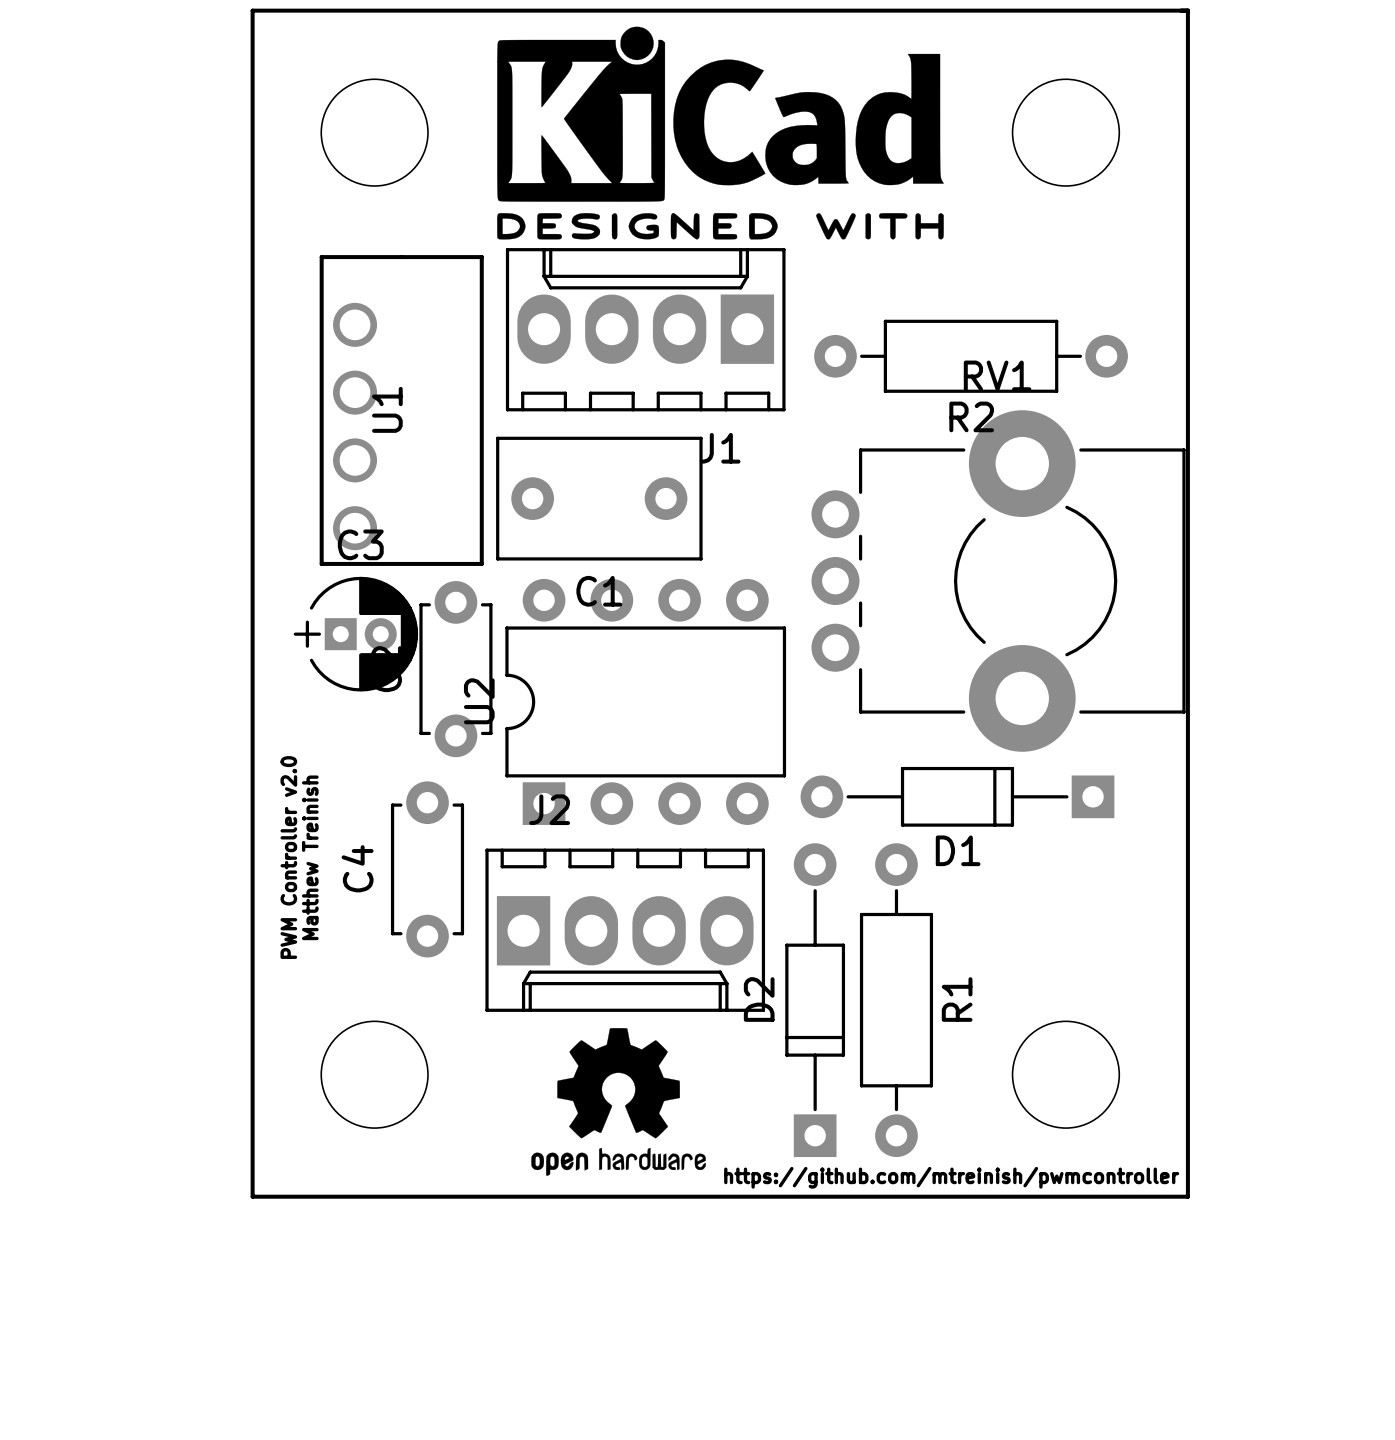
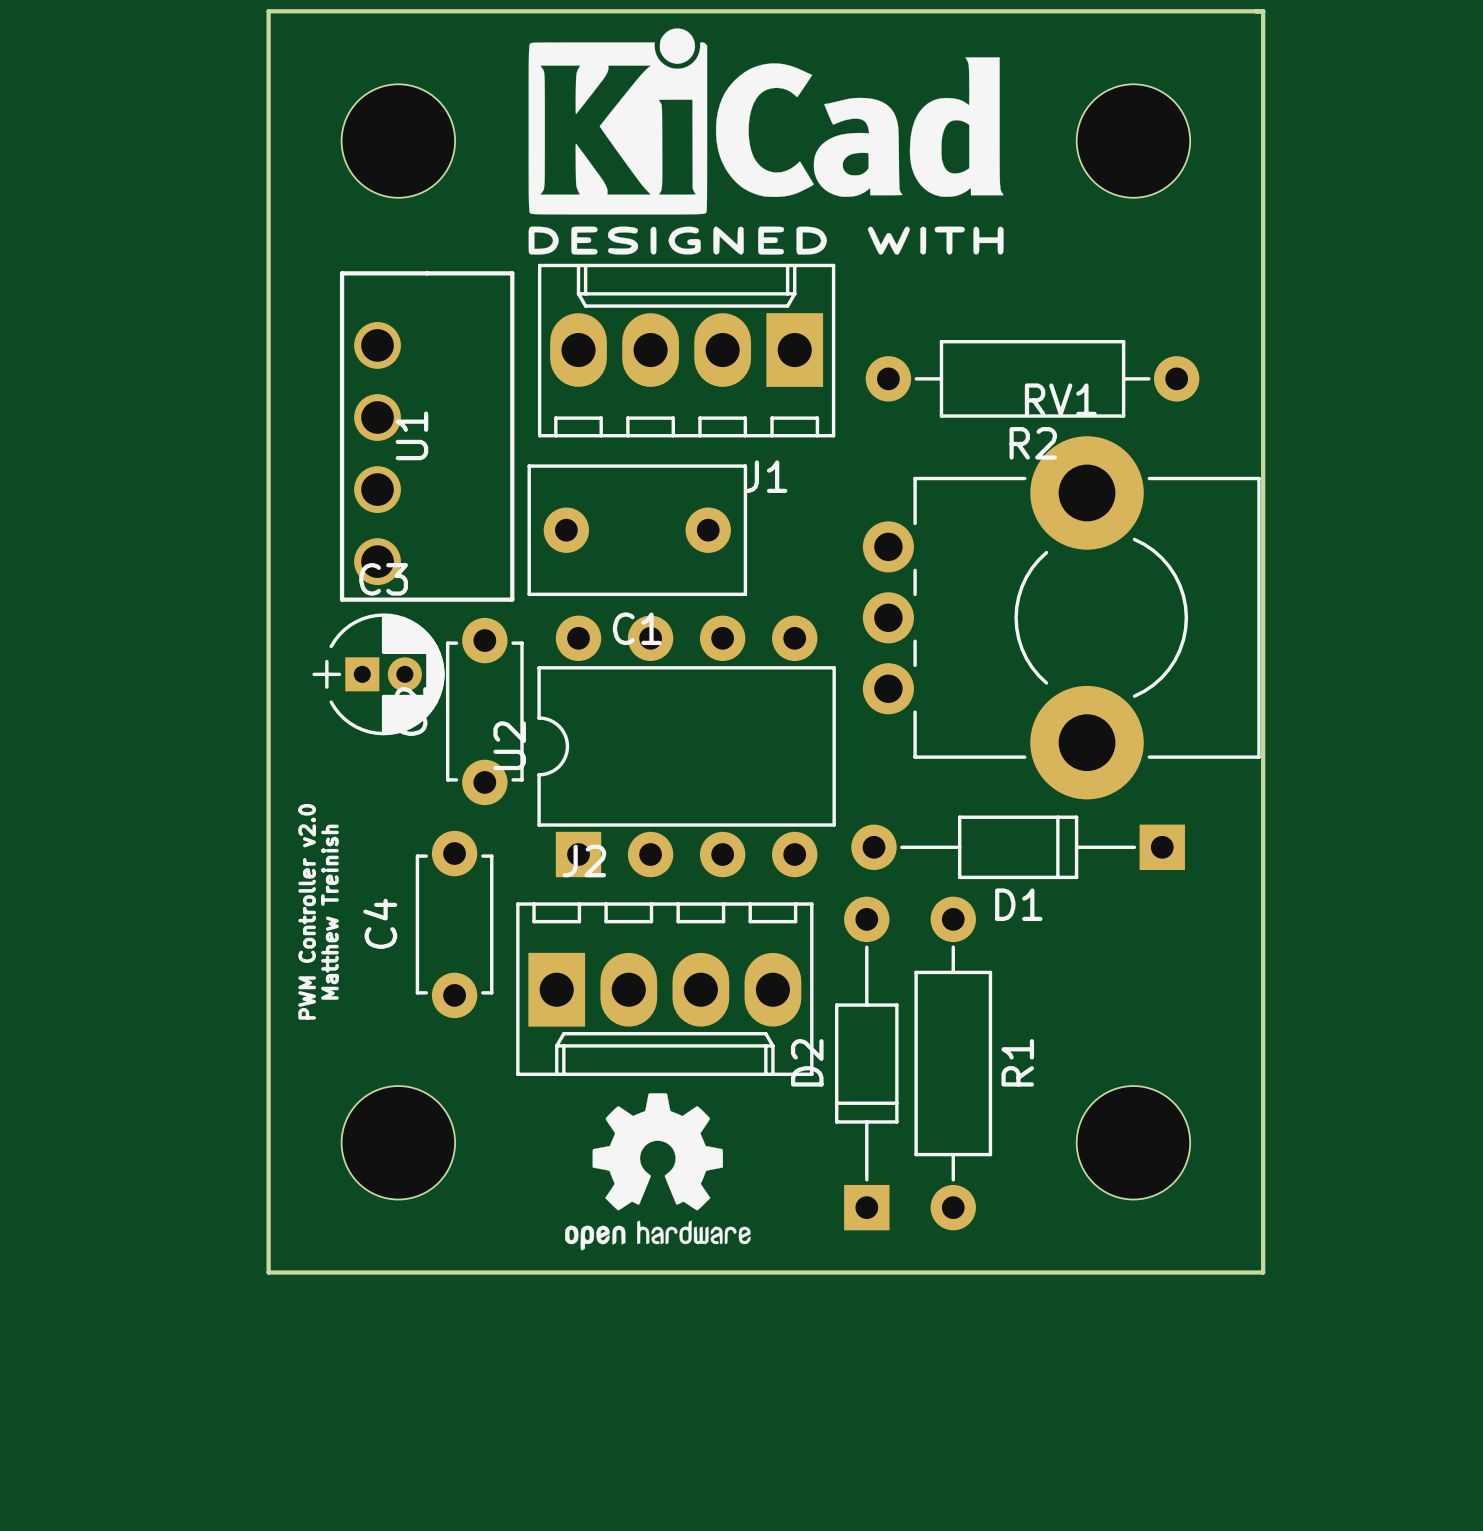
text: https://github.com/mtreinish/pwmcontroller (951, 1177) -> none

